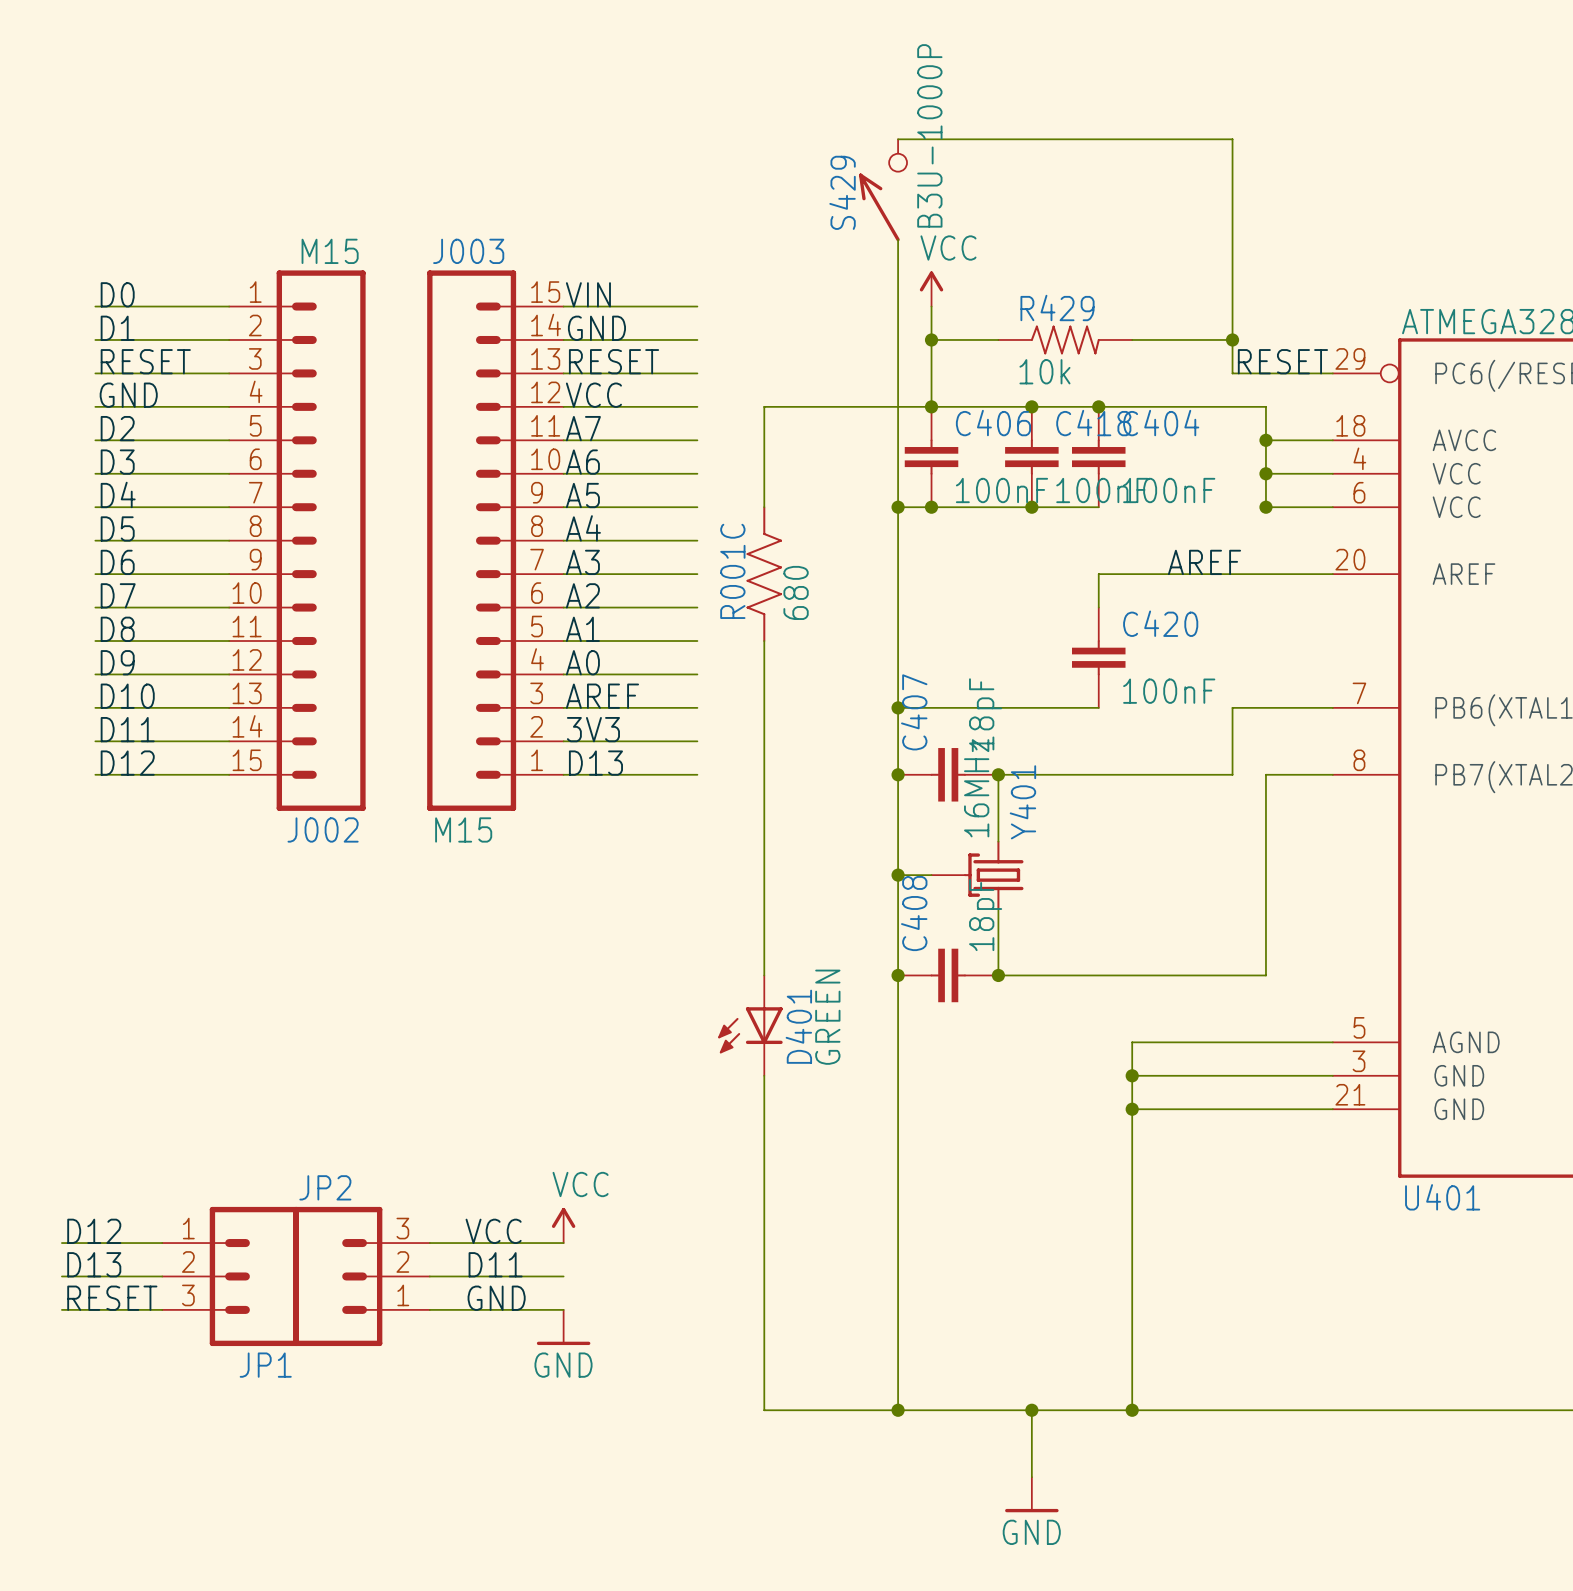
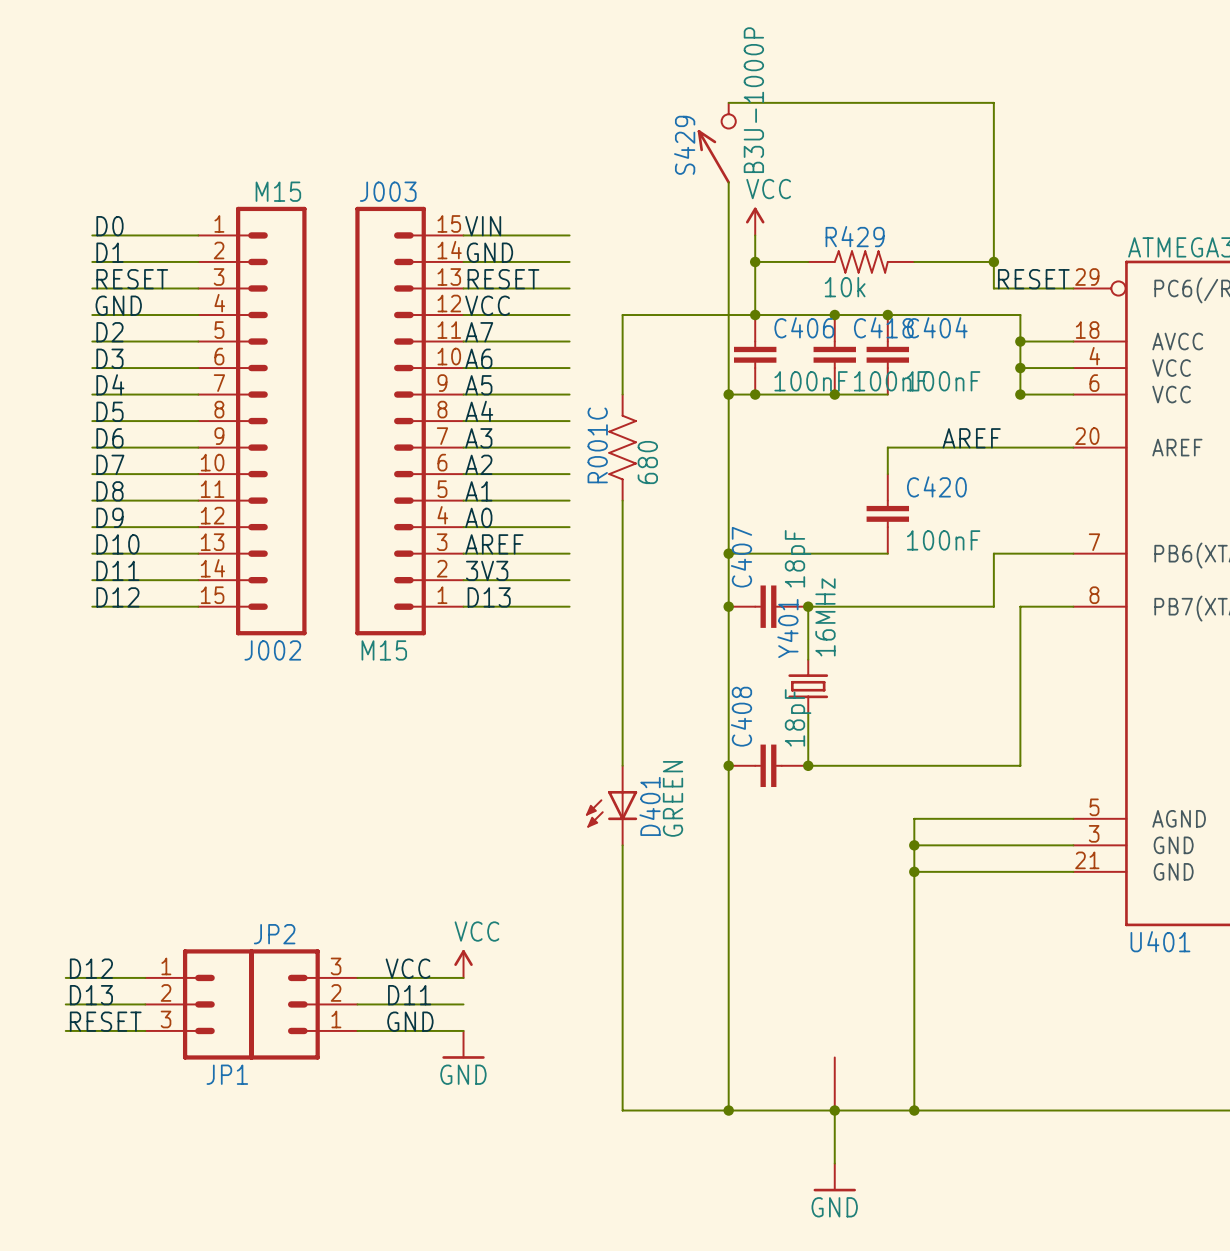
Y401 name position: Y401 (1022, 802) -> Y401 (787, 628)
Y401 symbol: [931, 840, 1024, 910] -> [788, 658, 829, 714]
wire: (898, 875) (931, 875) -> none
junction: (898, 875) -> none
part: none -> (834, 1084)

